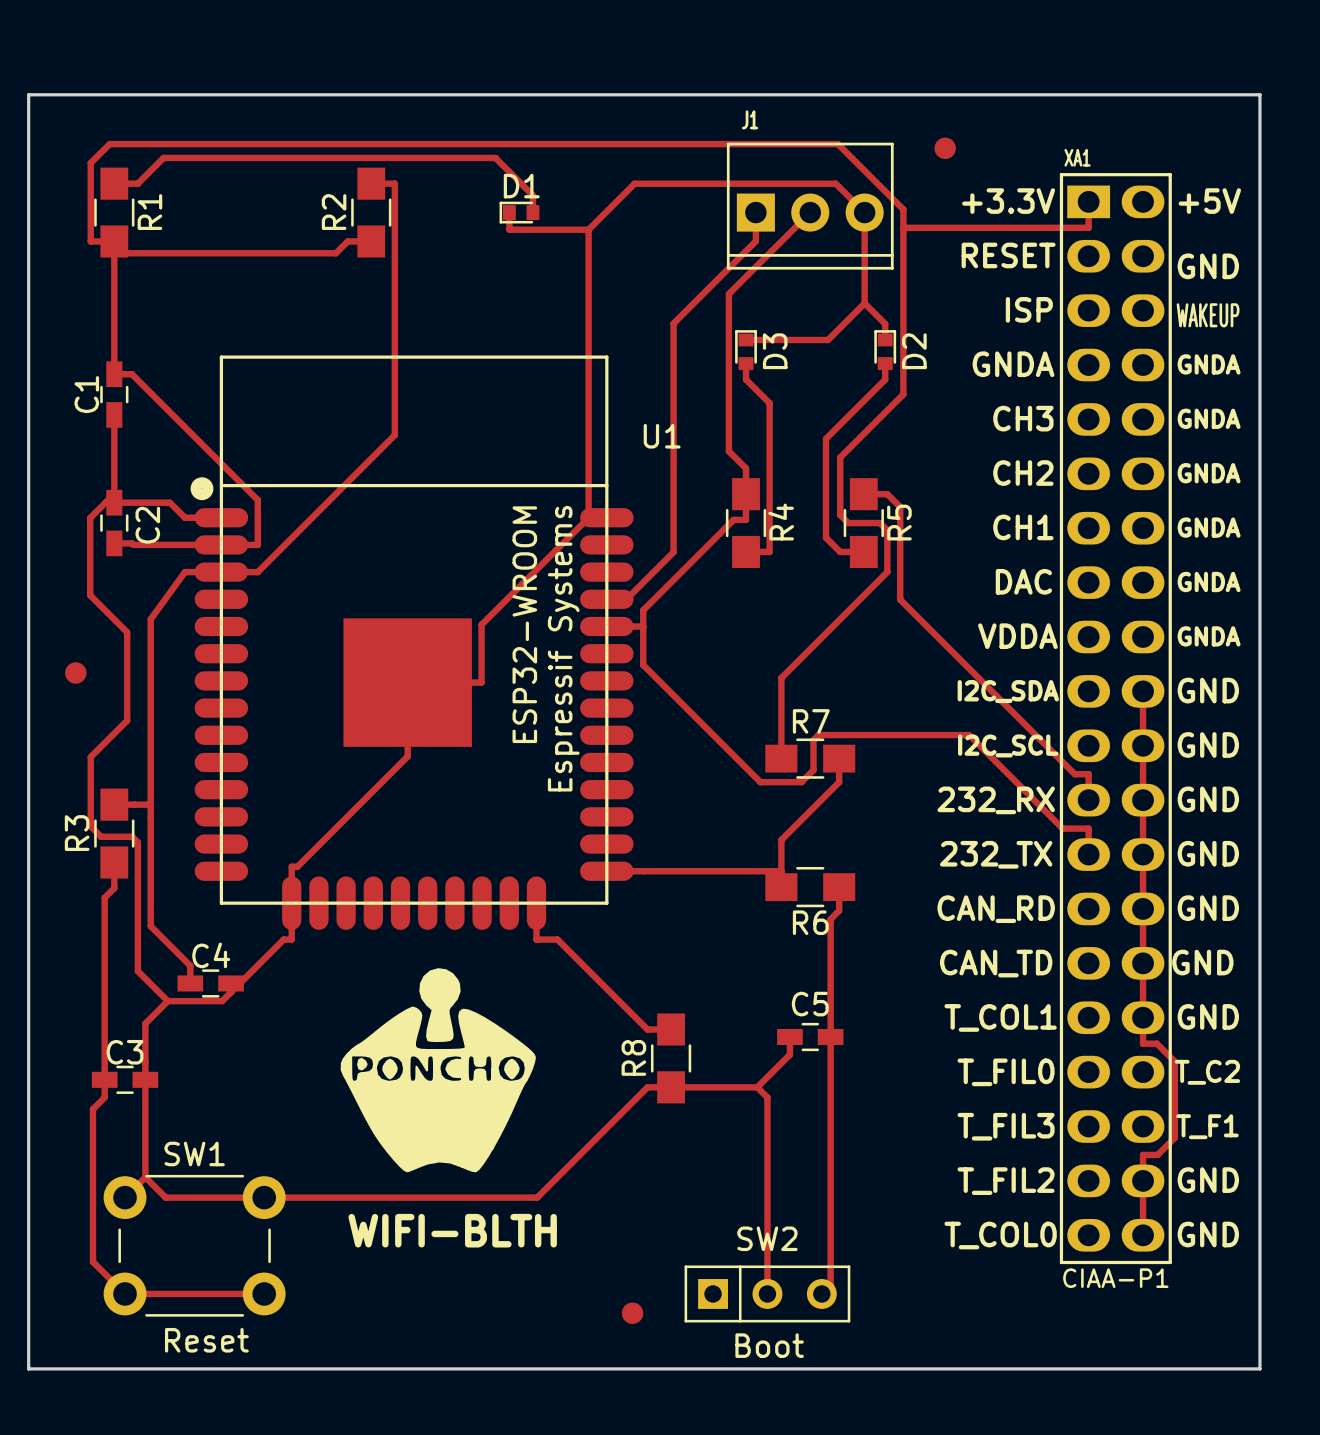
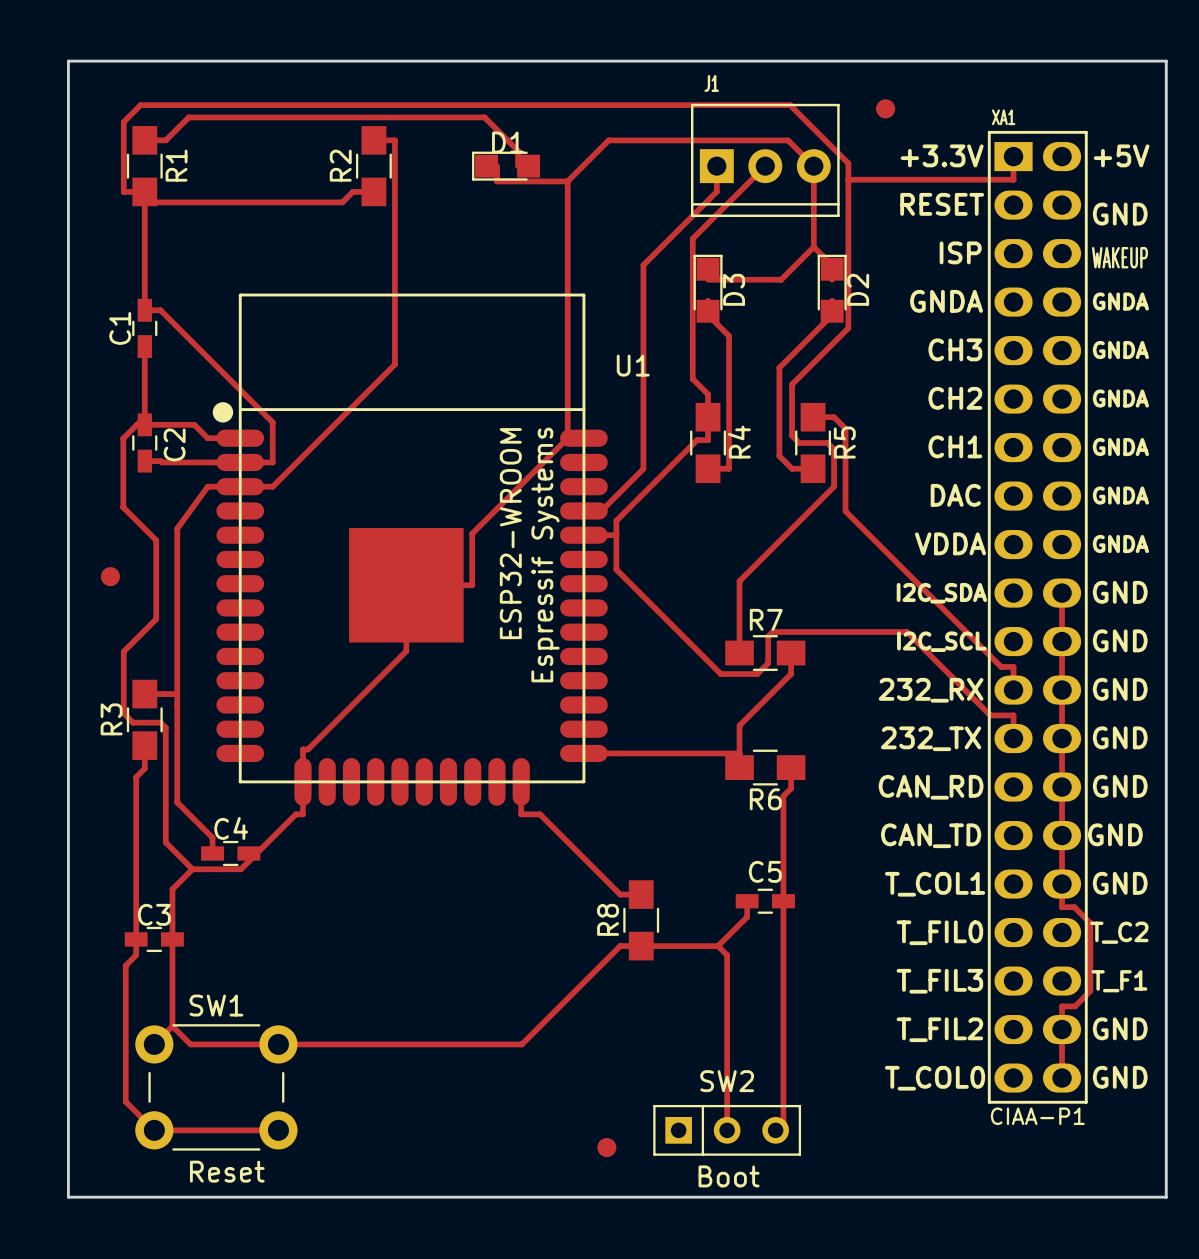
D1 footprint: [499, 201, 540, 224] -> [472, 151, 541, 181]
D3 footprint: [735, 330, 757, 370] -> [693, 254, 723, 323]
D2 footprint: [874, 330, 897, 370] -> [817, 254, 847, 323]
drawing: [340, 968, 536, 1173] -> none

